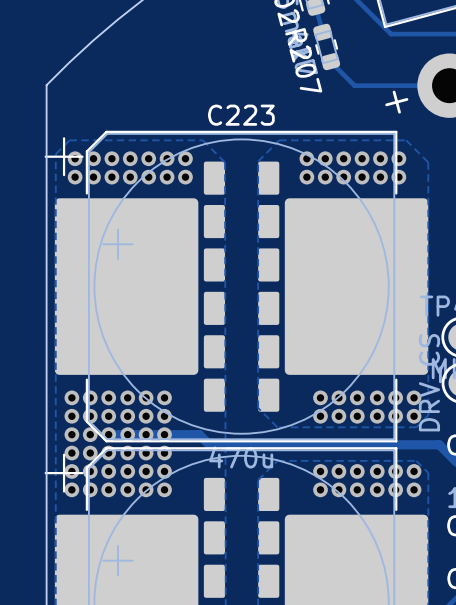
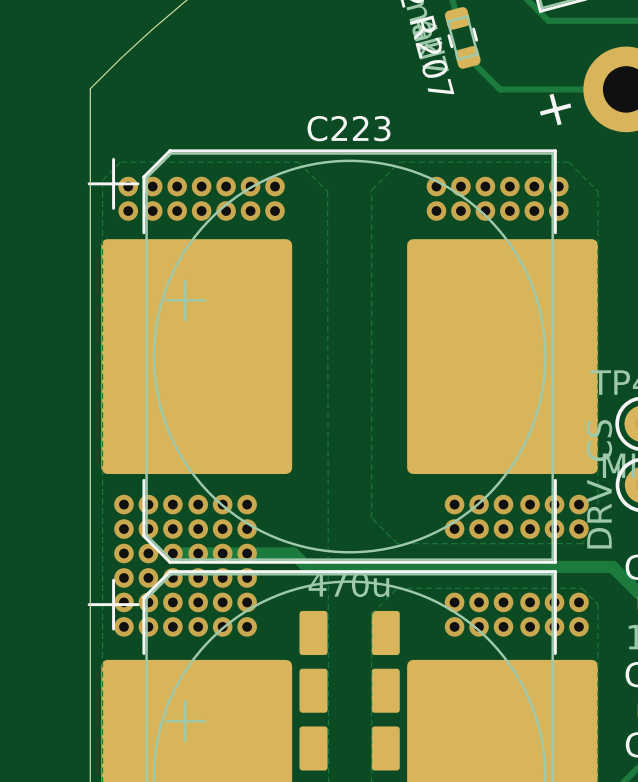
C223 footprint: [44, 130, 429, 443] -> [87, 149, 598, 564]

